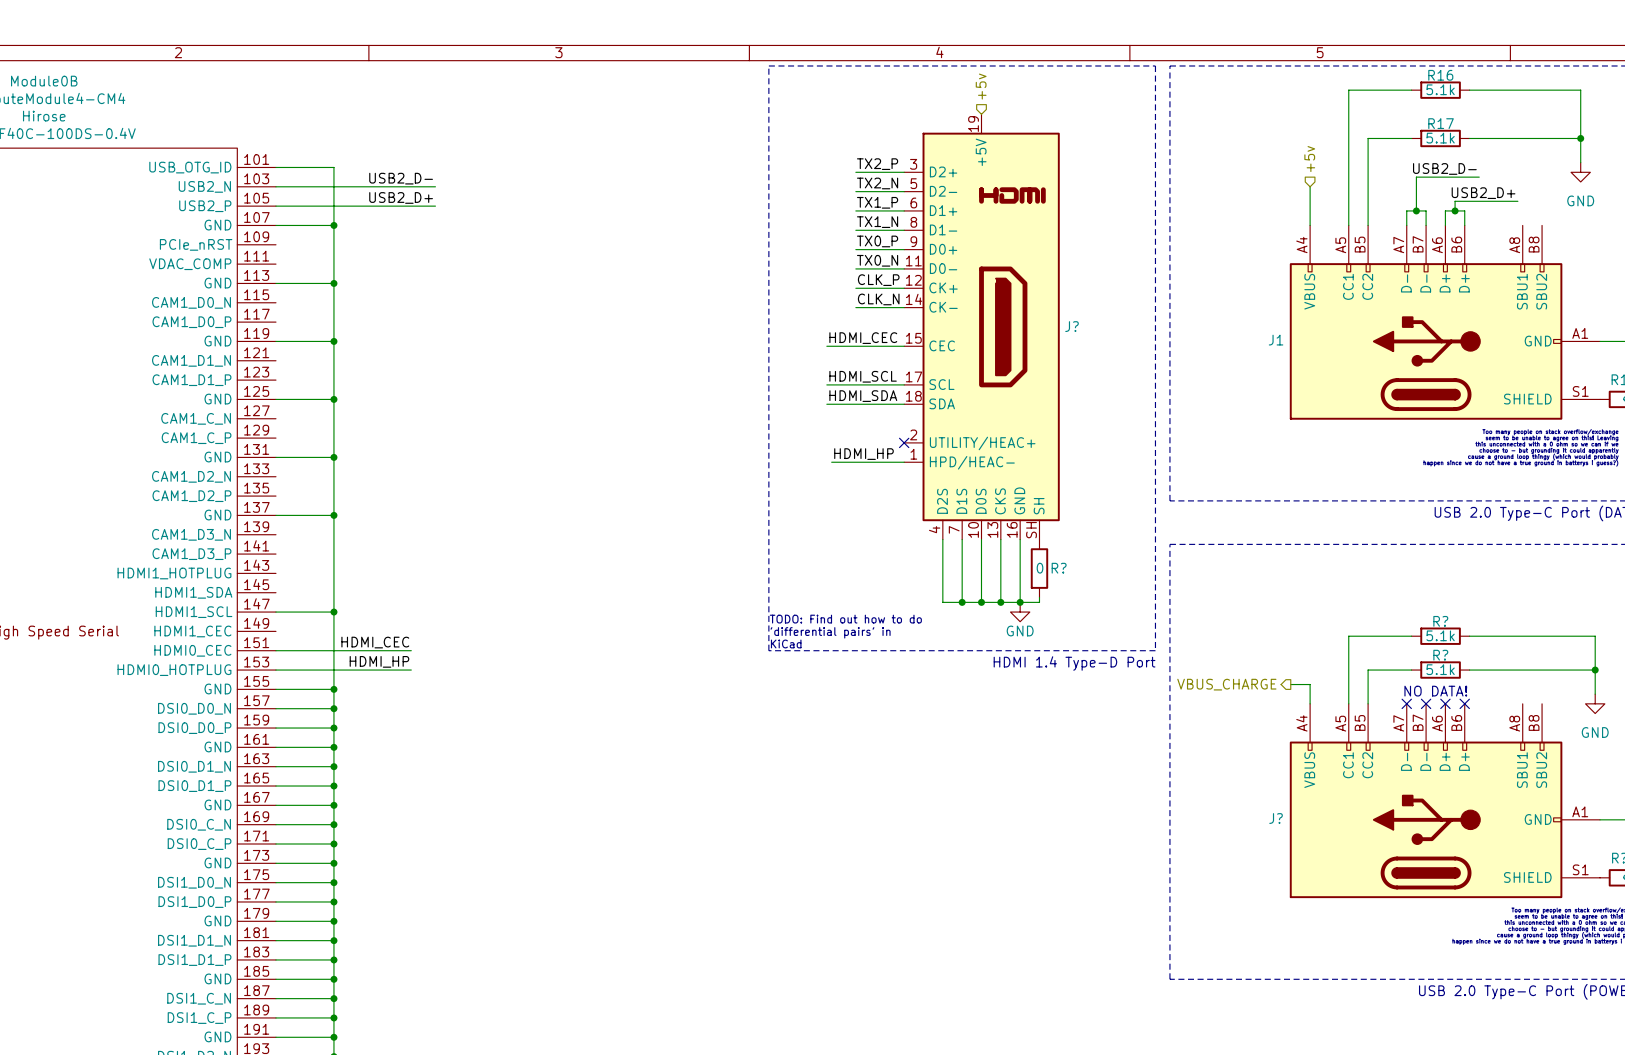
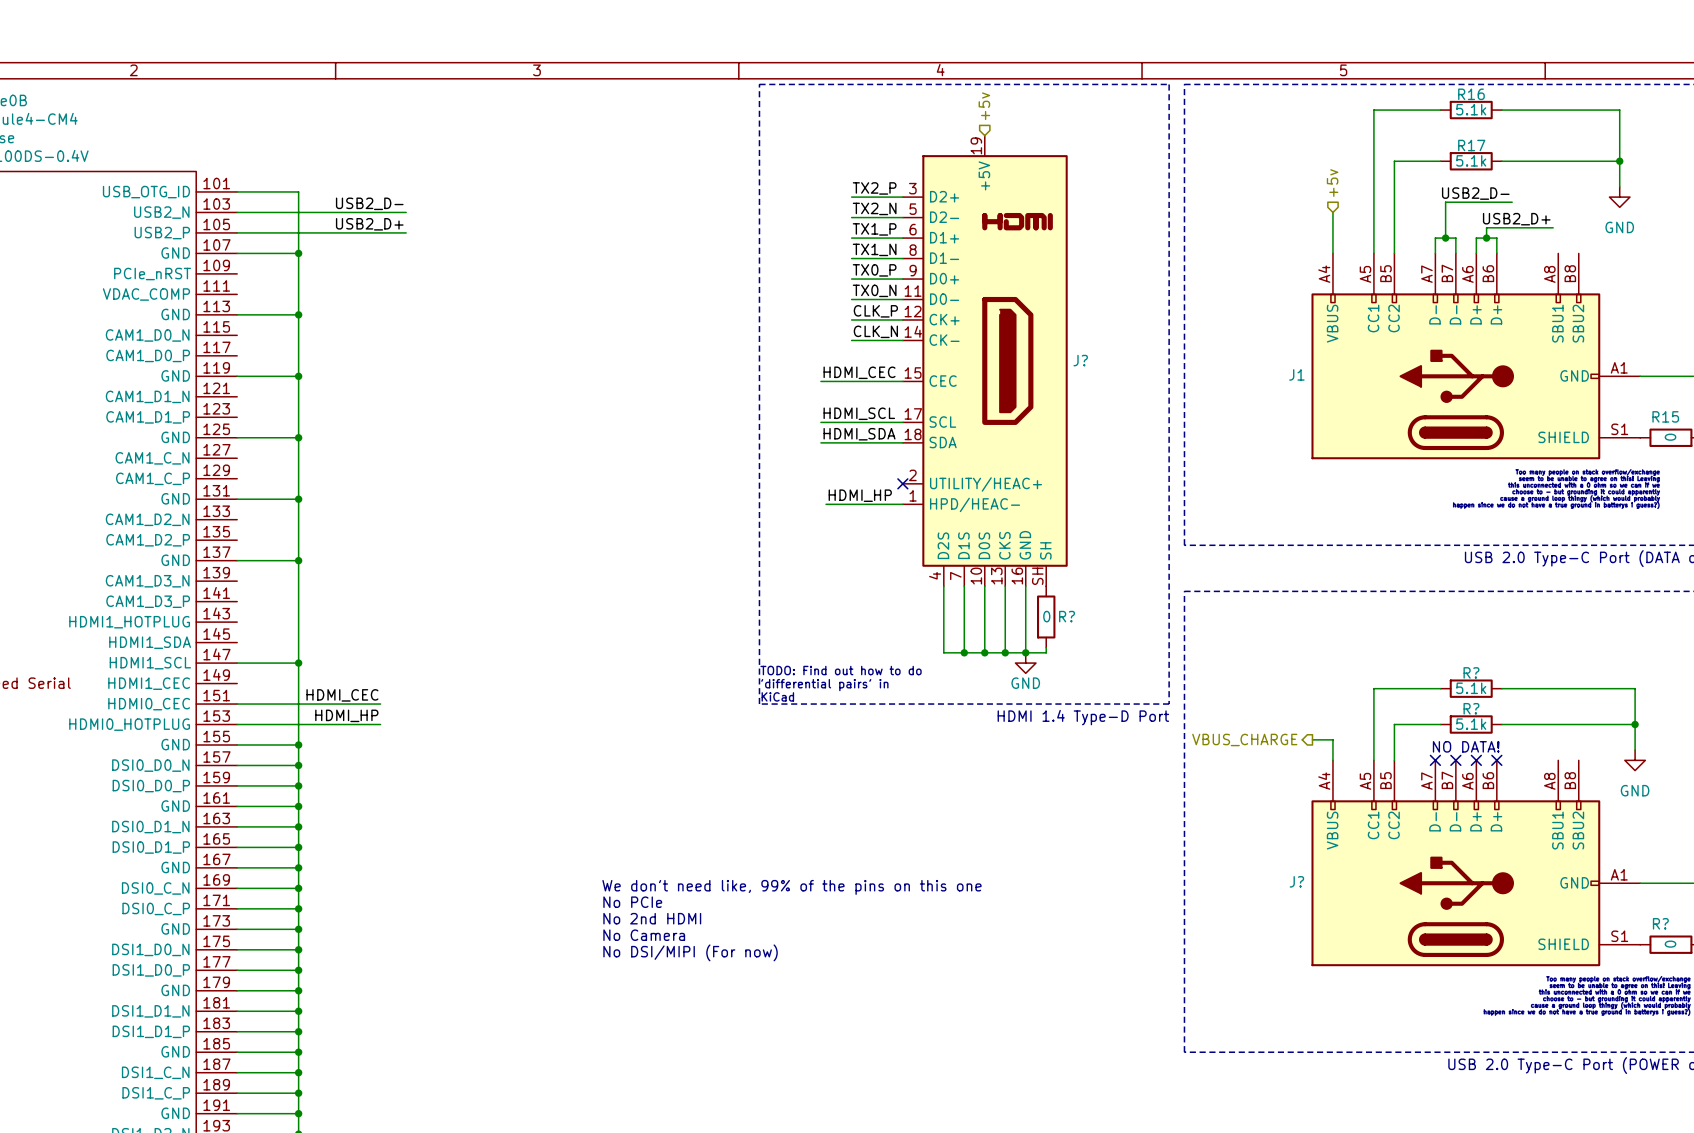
text: none -> We don't need like, 99% of the pins on this one (791, 887)
text: none -> No PCIe (632, 902)
text: none -> No 2nd HDMI (652, 918)
text: none -> No Camera (644, 935)
text: none -> No DSI/MIPI (For now) (690, 952)

